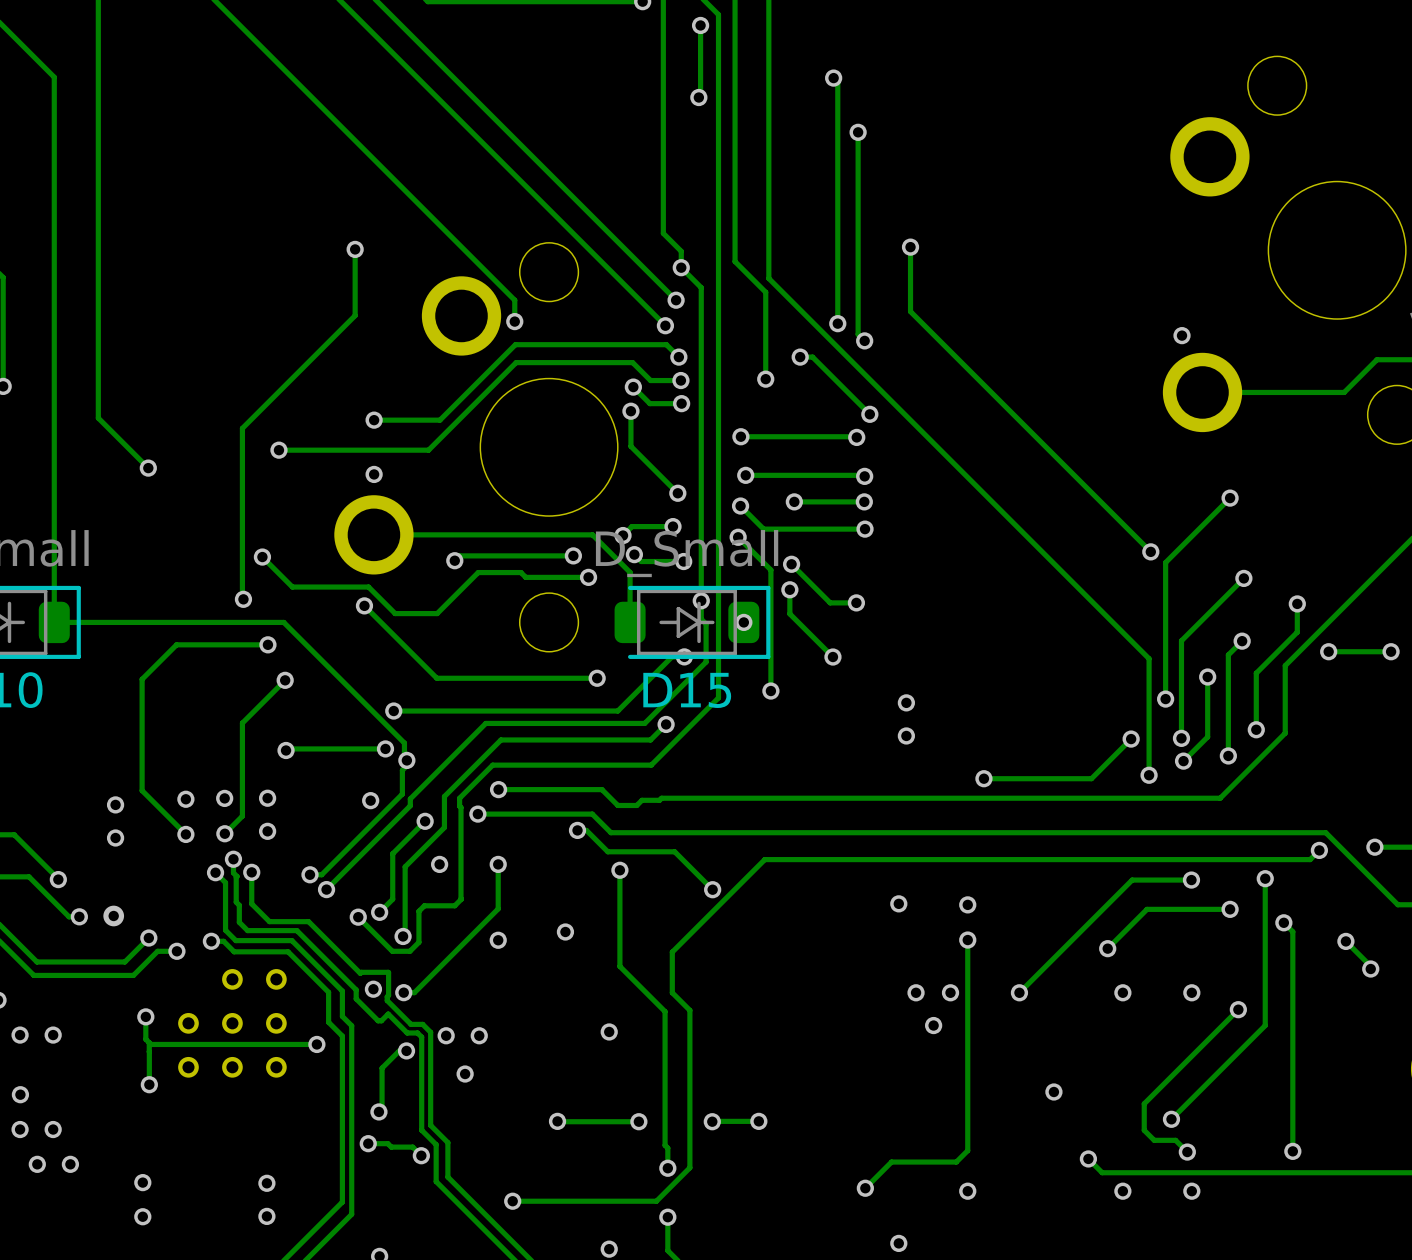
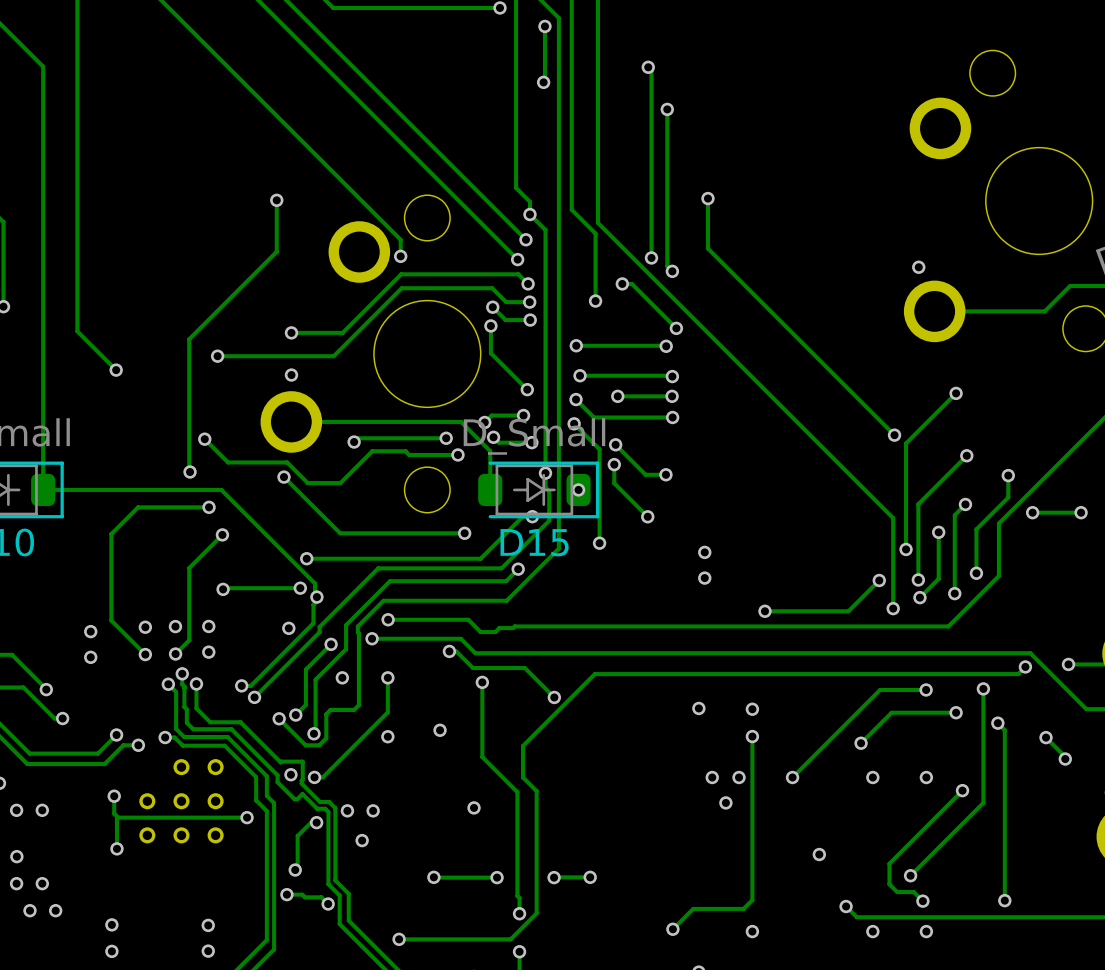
via: (113, 915) -> none

